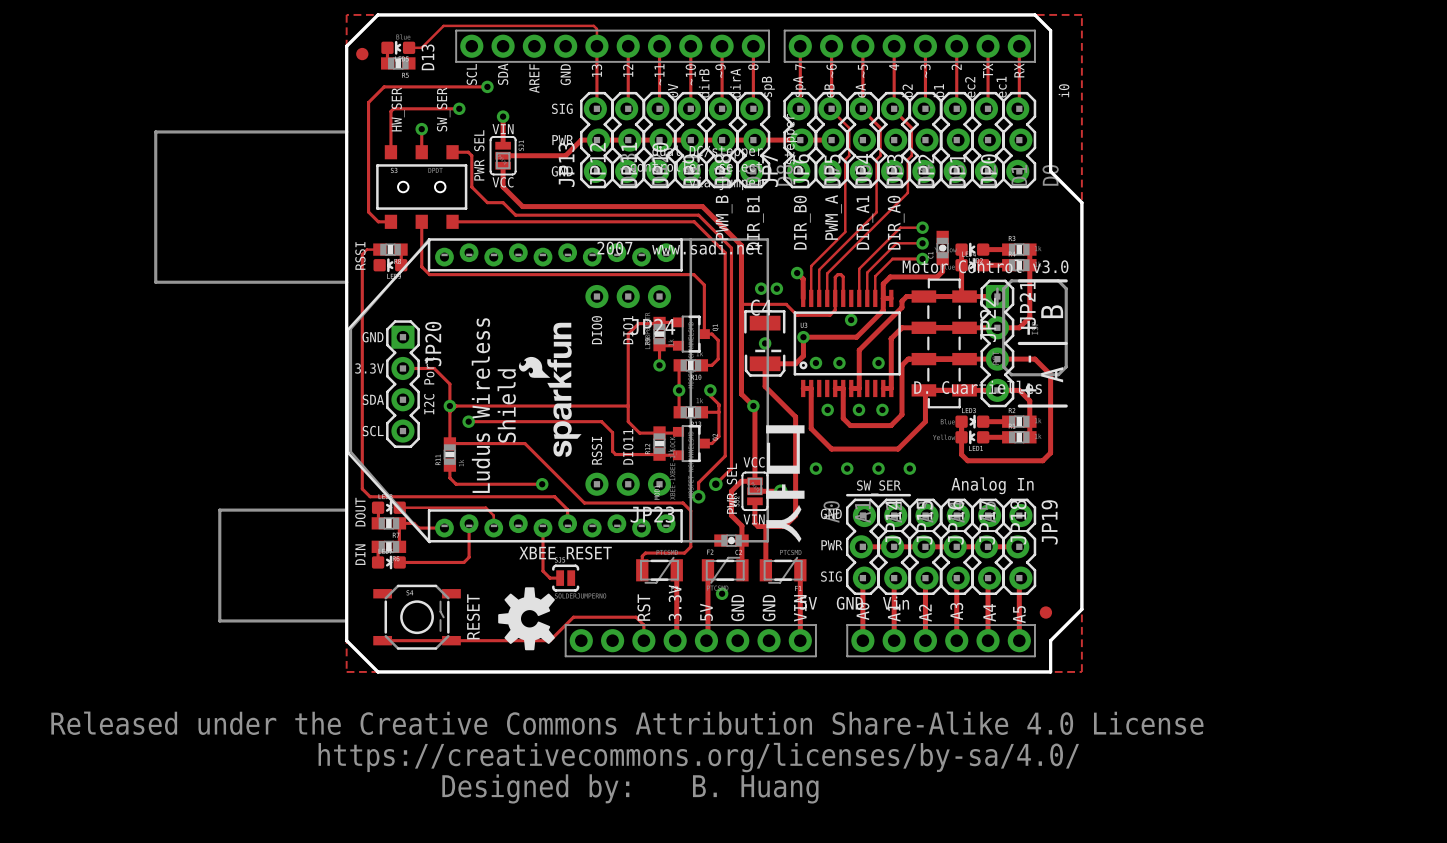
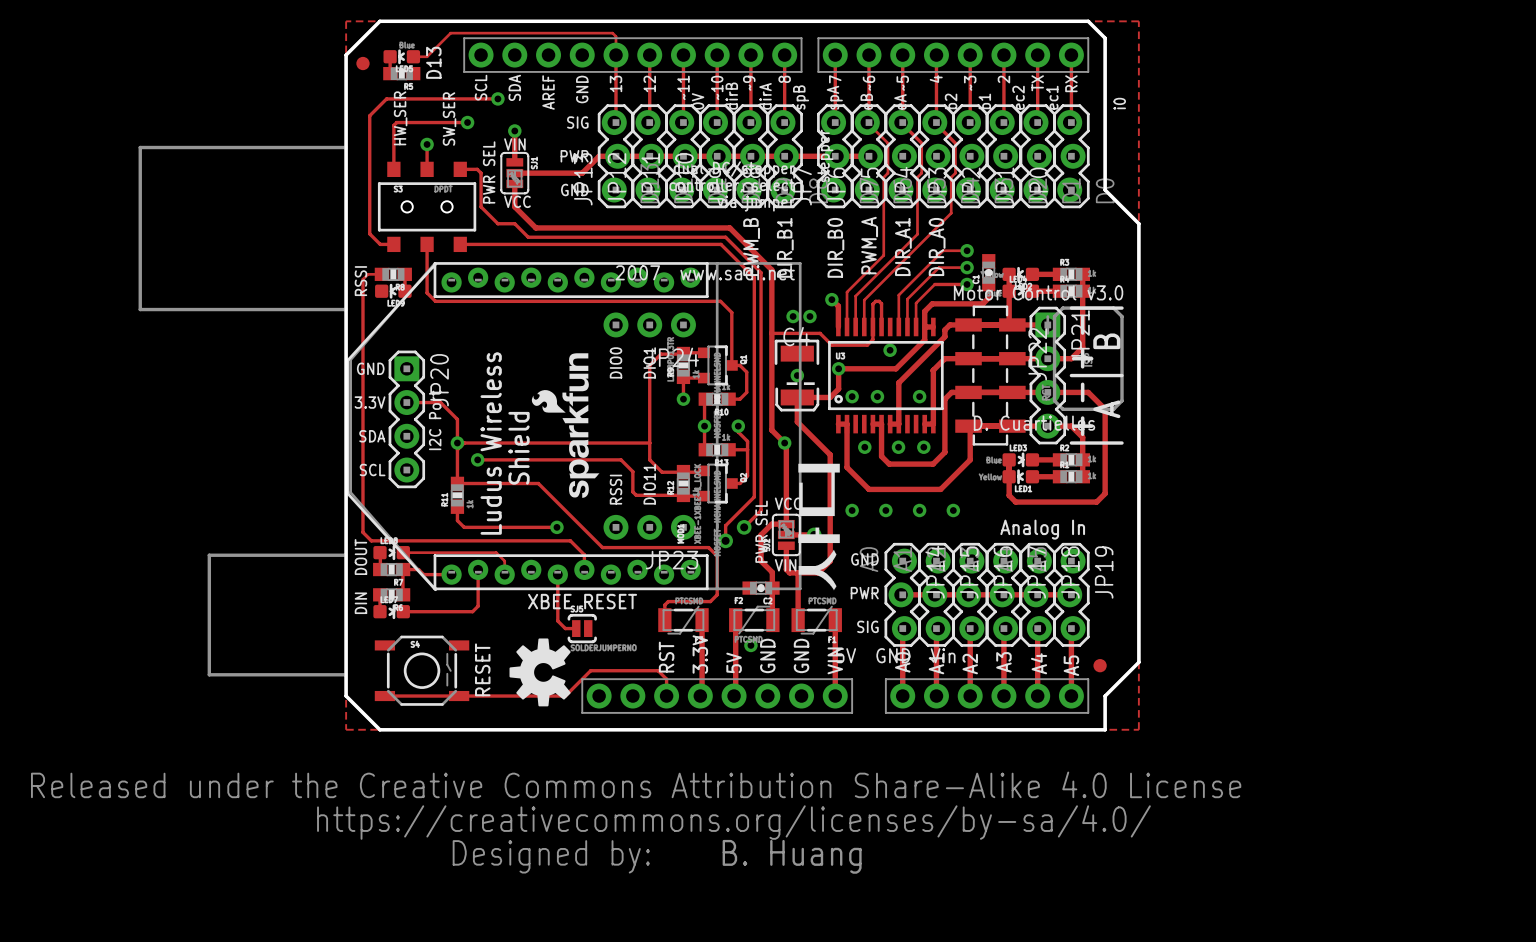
text: SW_SER (878, 487) -> none
line: (847, 495) (909, 495) -> none

